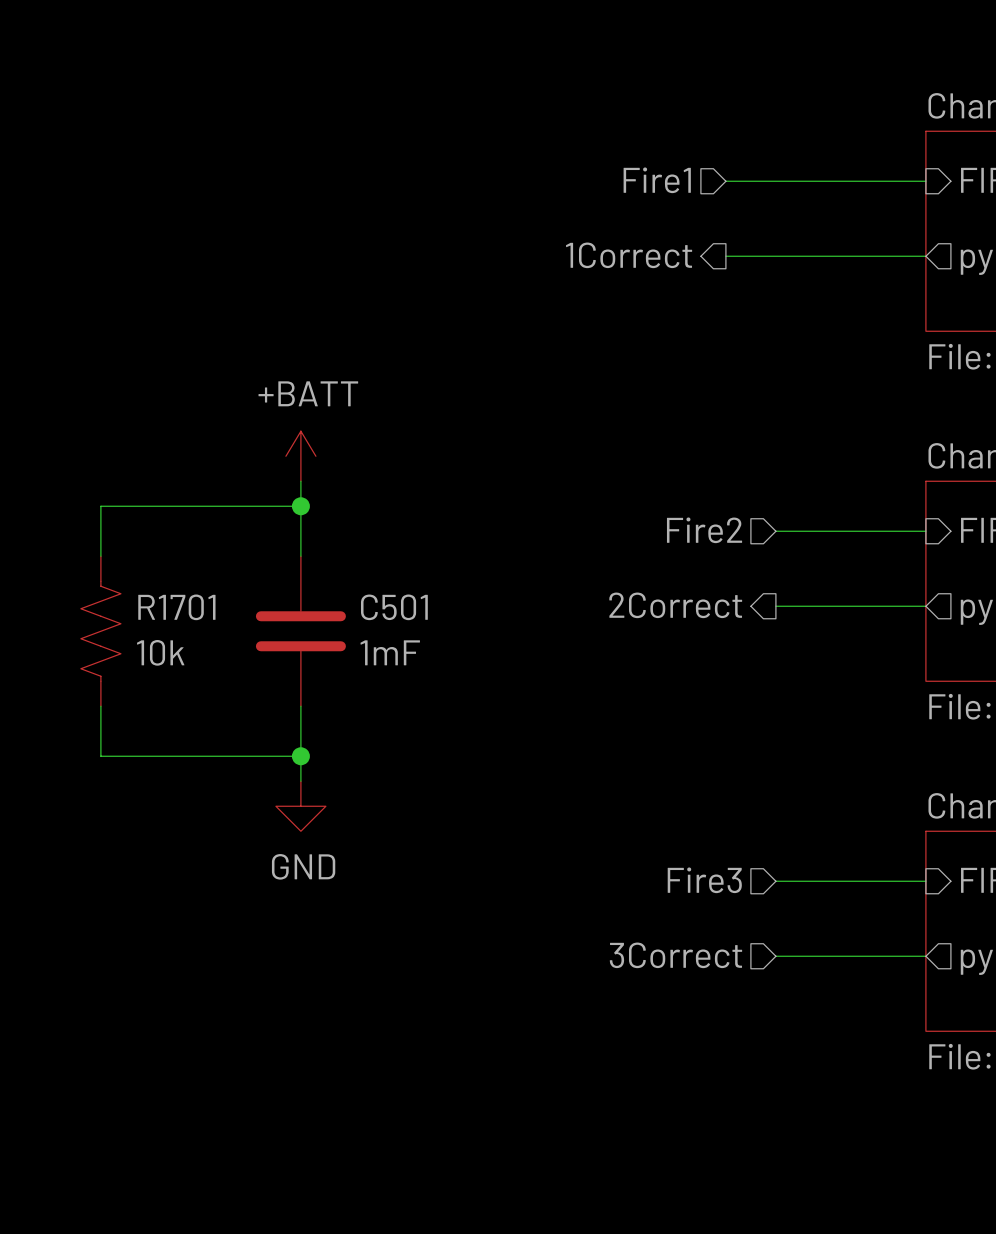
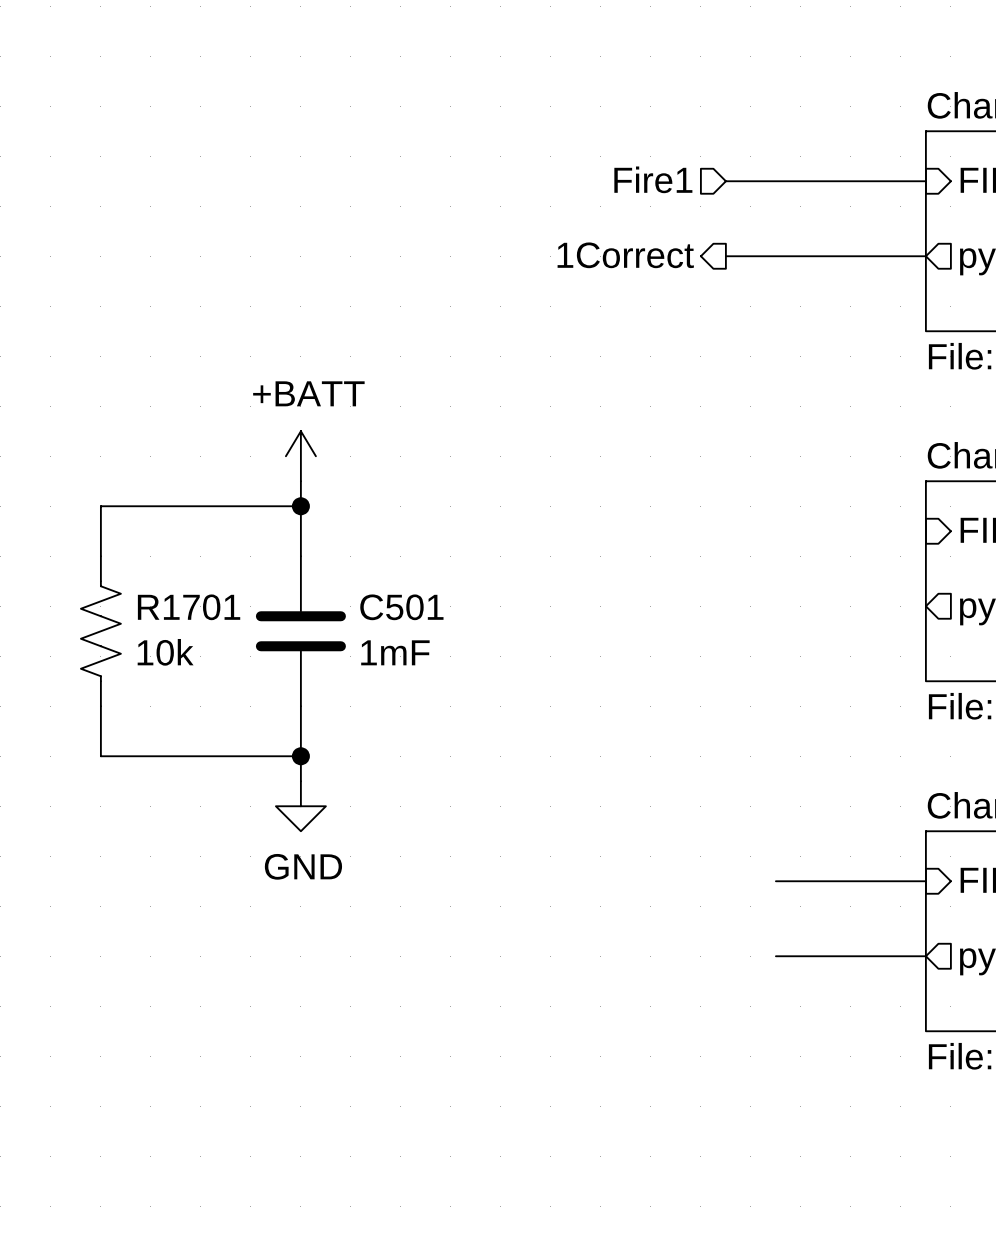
hierarchical label: Fire2 (704, 530) -> none
wire: (775, 531) (925, 531) -> none
hierarchical label: 2Correct (675, 605) -> none
wire: (775, 606) (925, 606) -> none
hierarchical label: Fire3 (704, 880) -> none
hierarchical label: 3Correct (675, 955) -> none

